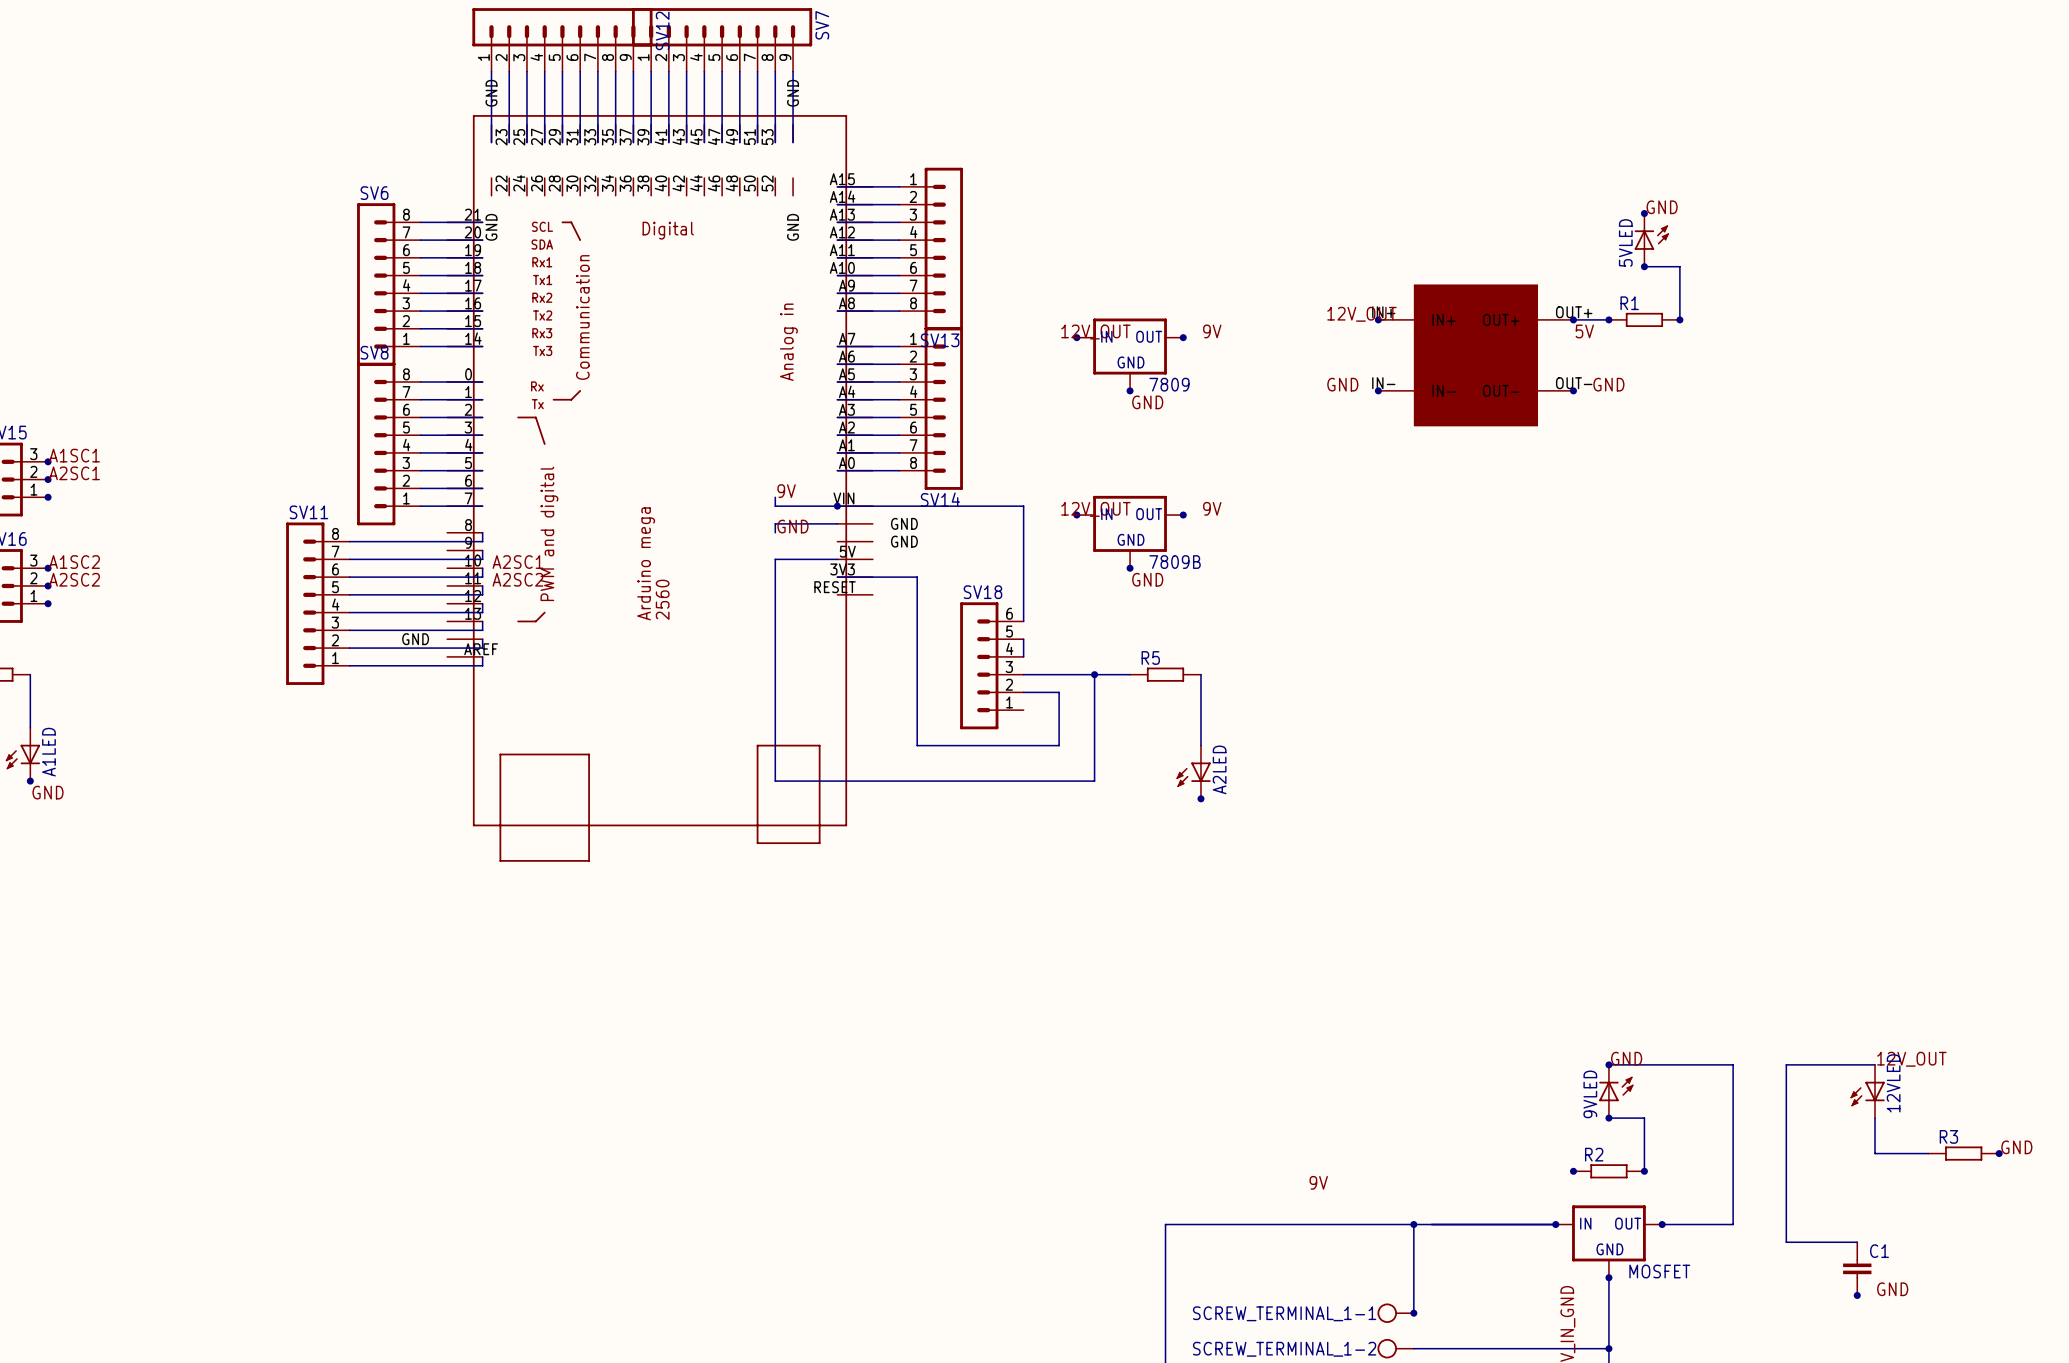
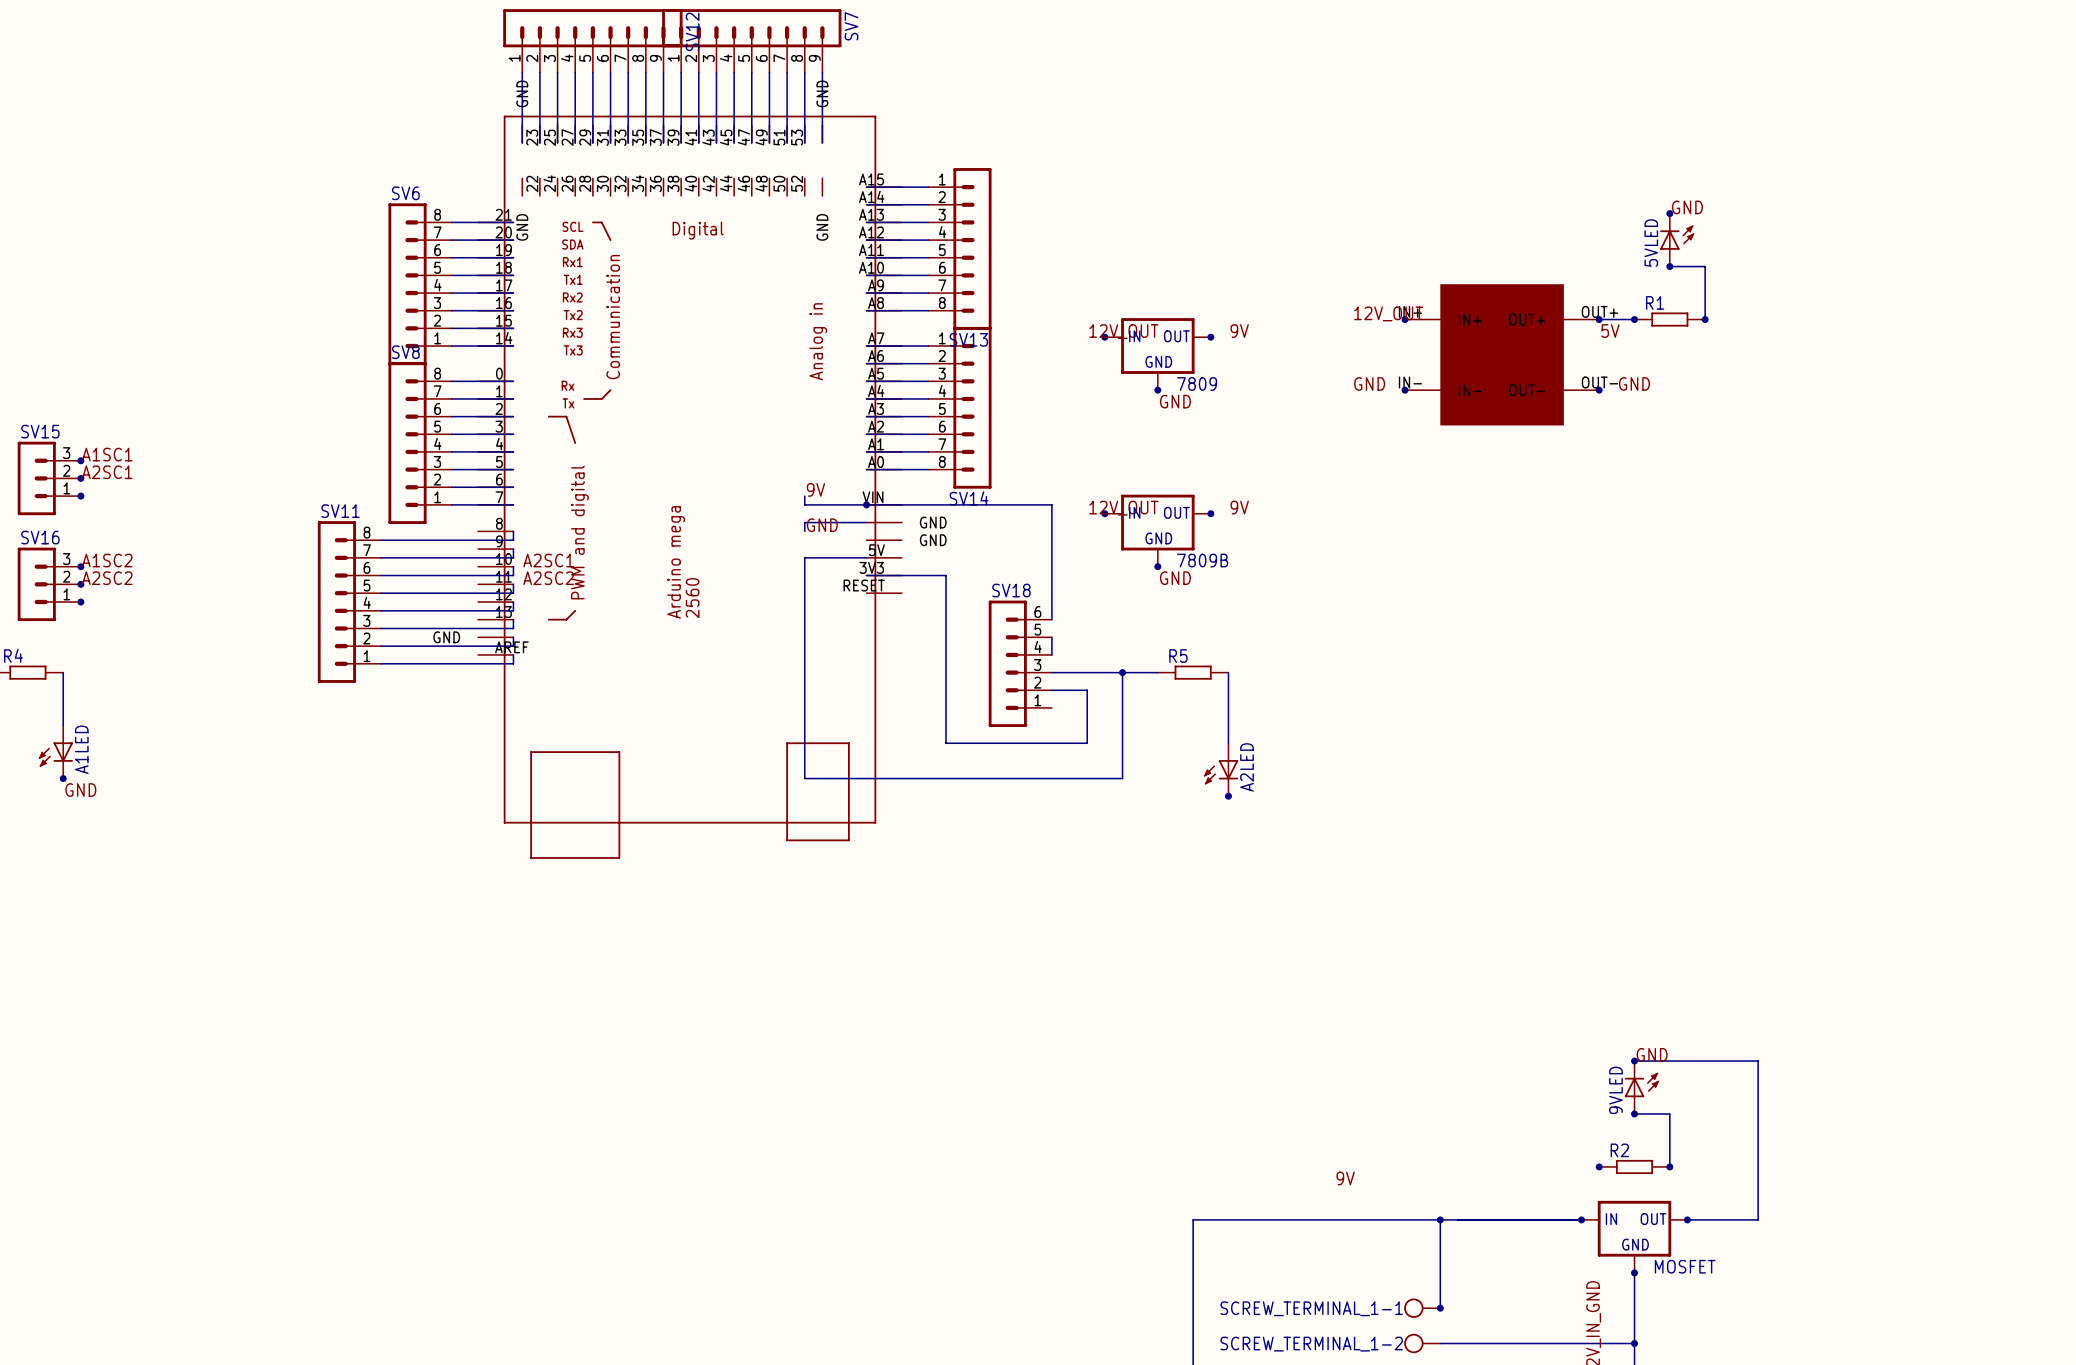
label: 12V_OUT (1911, 1059) -> none
wire: (1875, 1064) (1786, 1064) (1786, 1242) (1857, 1242) -> none
12VLED: (1867, 1091) -> none
wire: (1875, 1118) (1875, 1153) (1928, 1153) -> none
label: GND (2016, 1147) -> none
R3: (1963, 1153) -> none
junction: (1999, 1153) -> none
C1: (1857, 1268) -> none
label: GND (1892, 1289) -> none
junction: (1857, 1295) -> none

